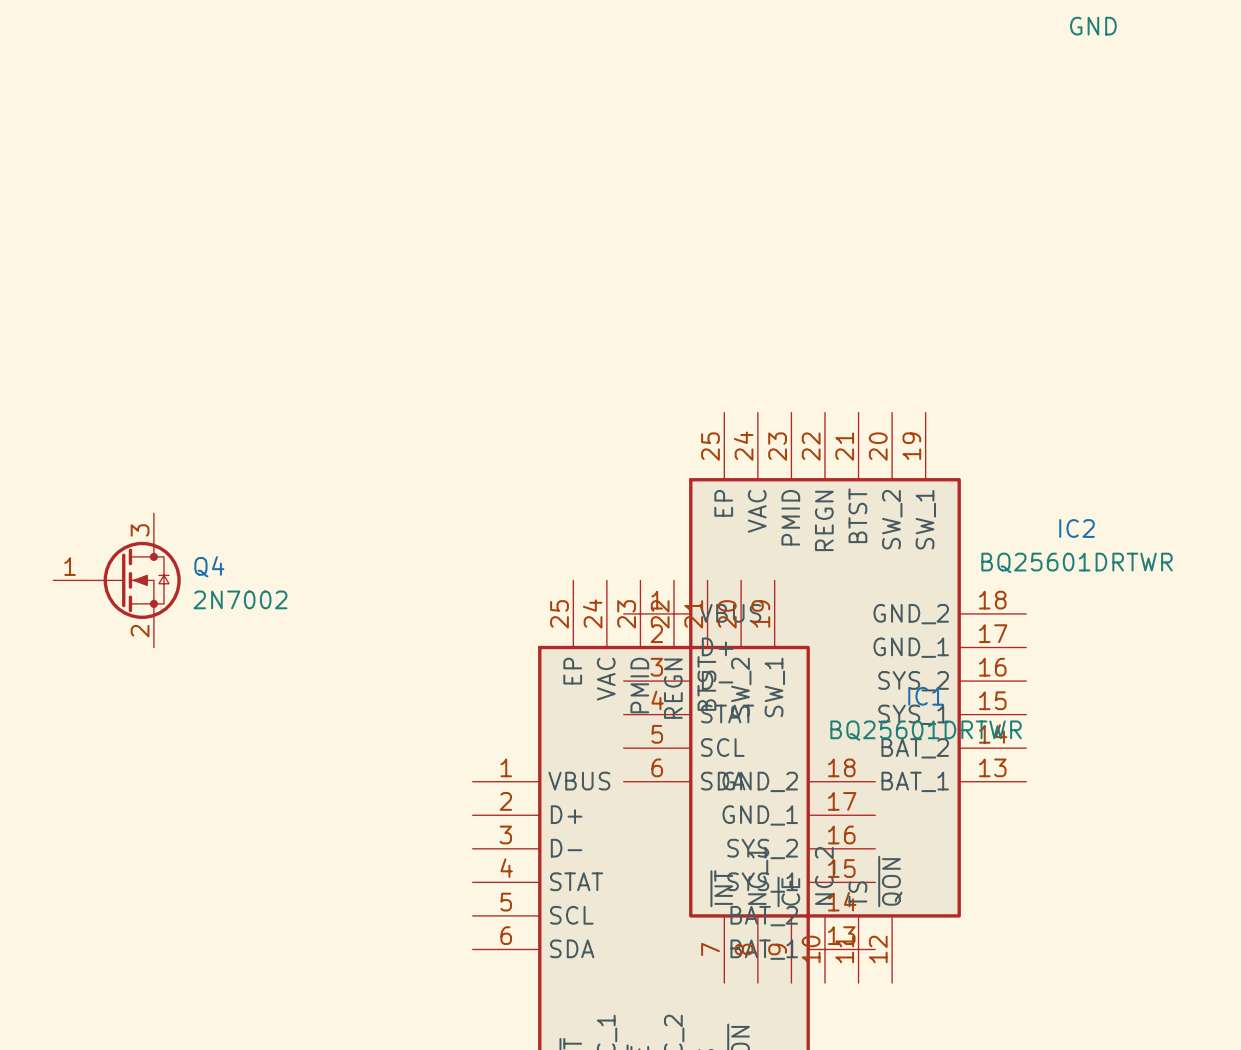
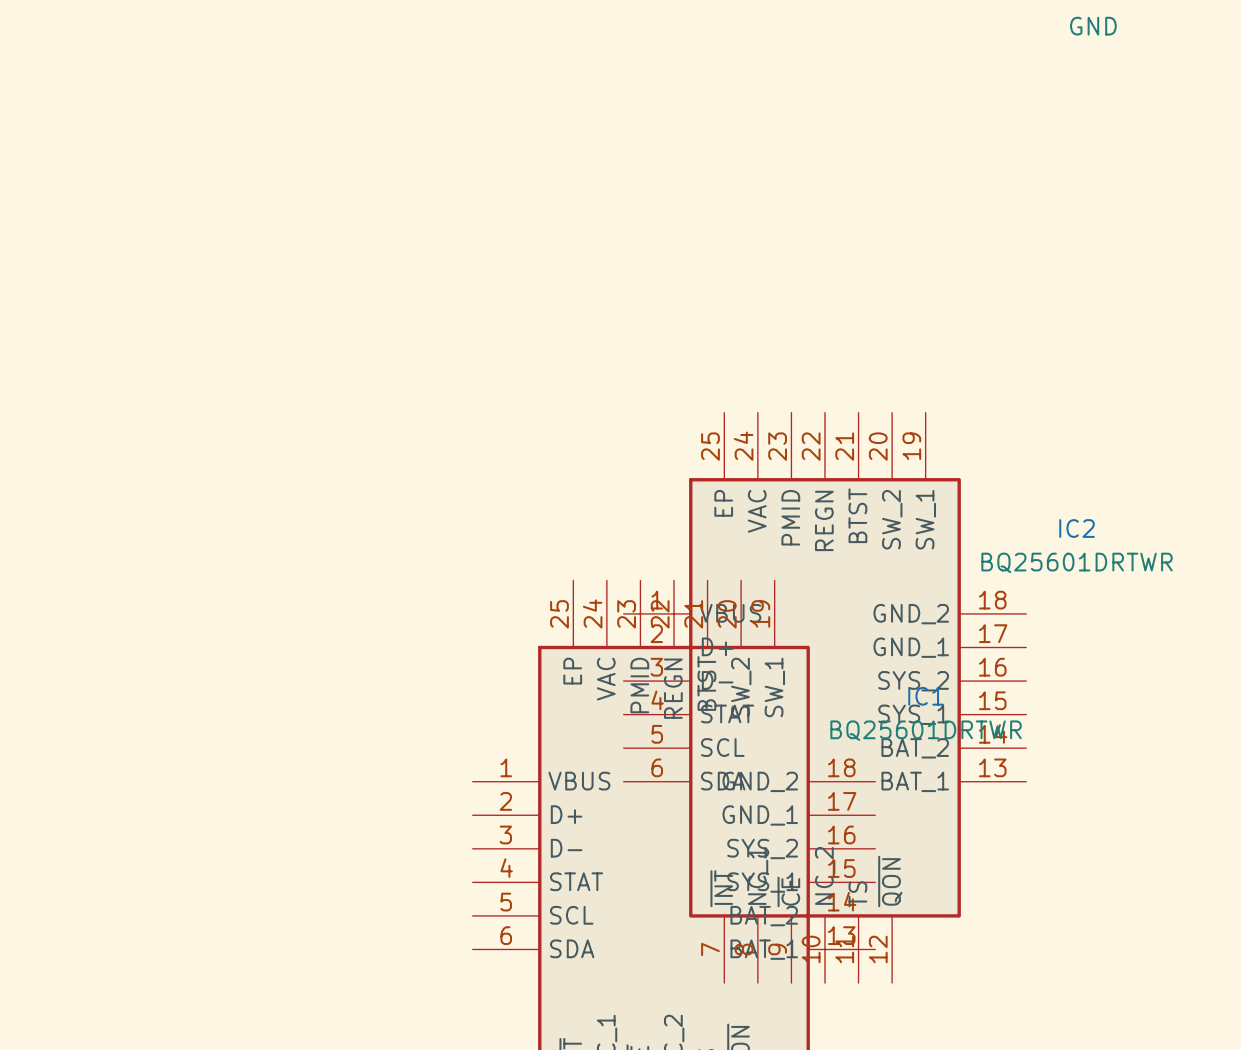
Q4: 2N7002 (117, 580) -> none

